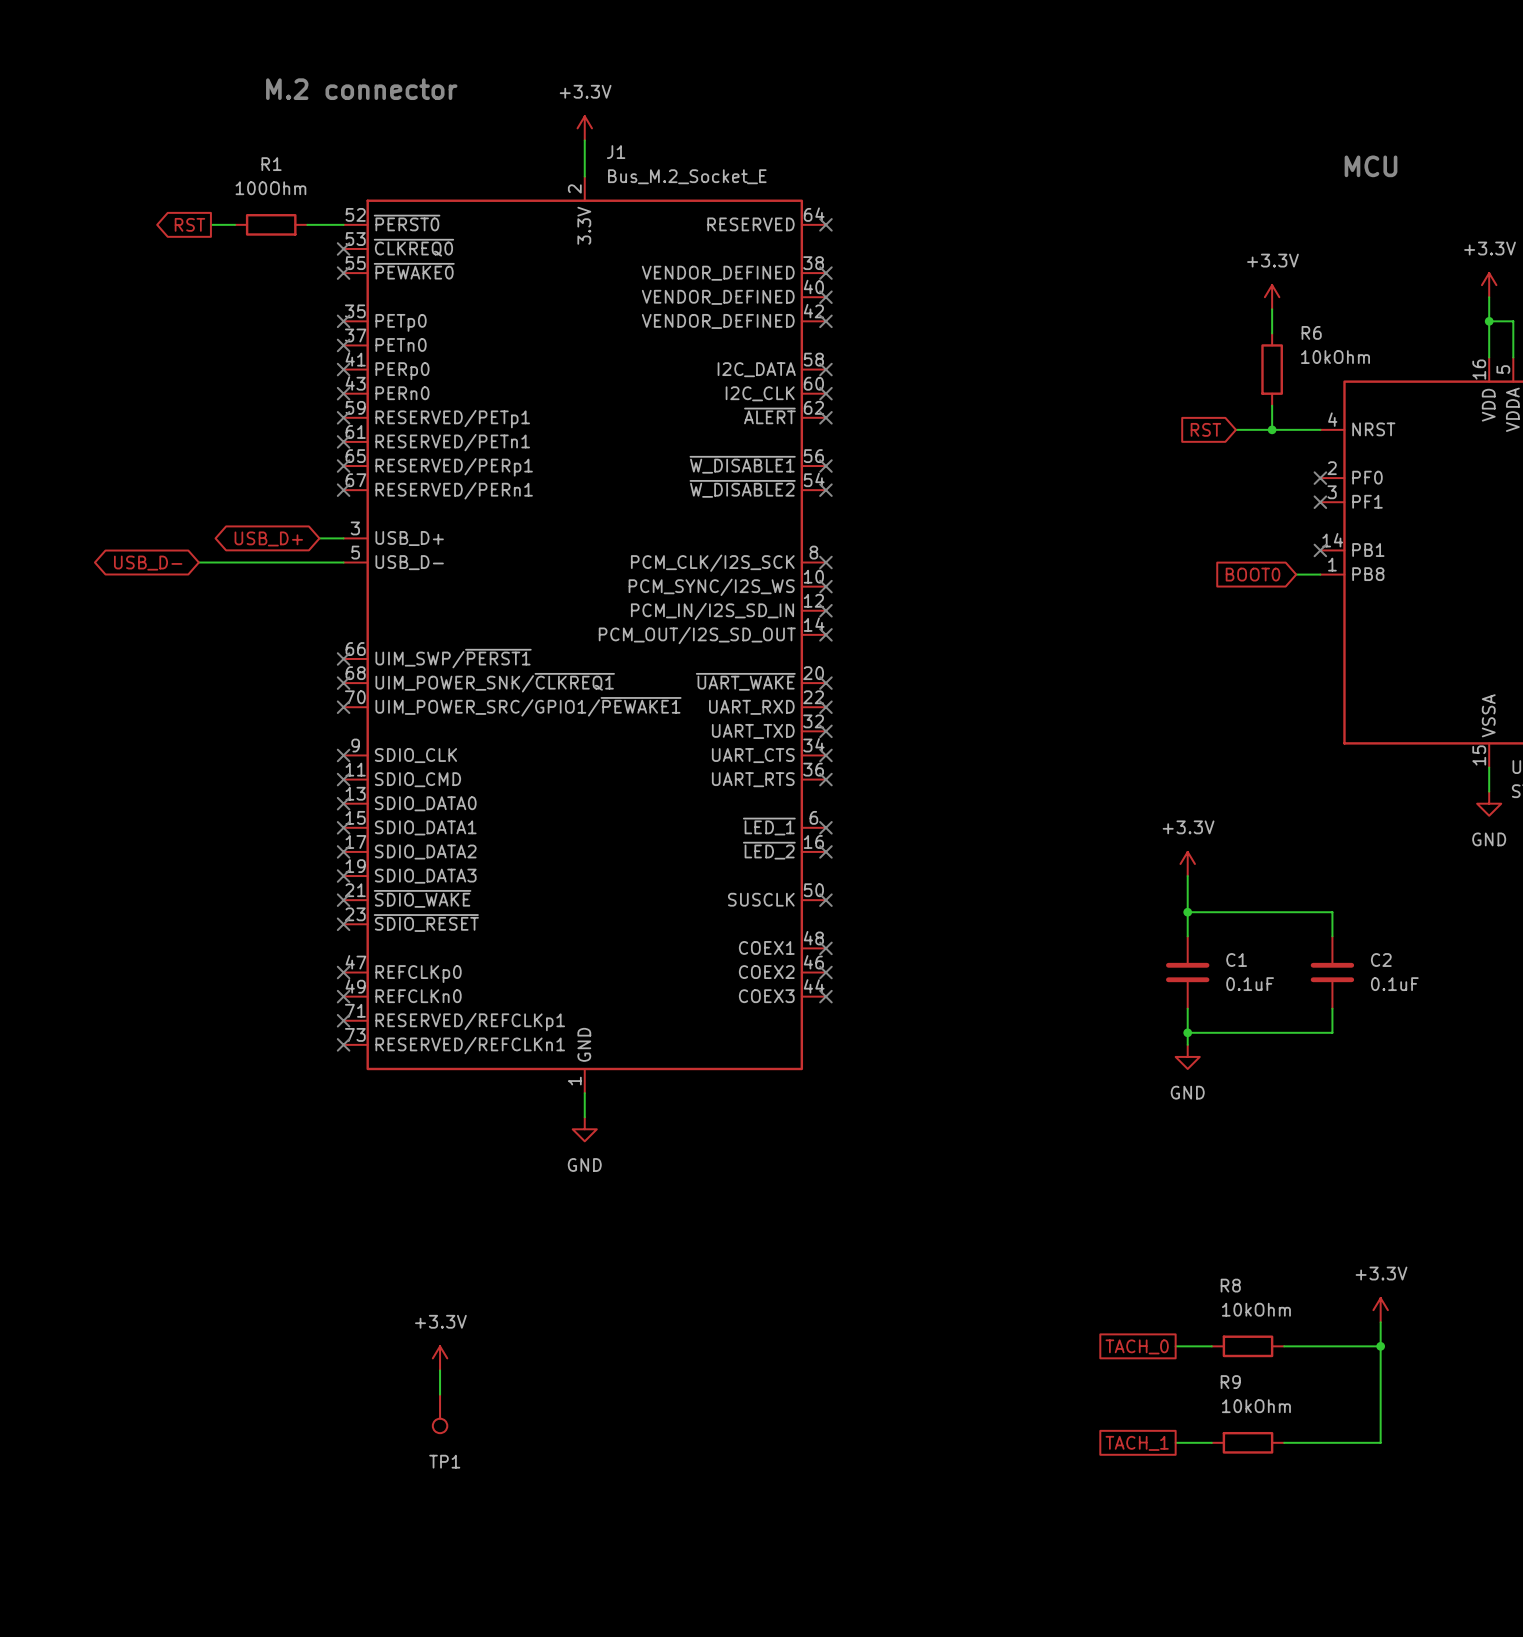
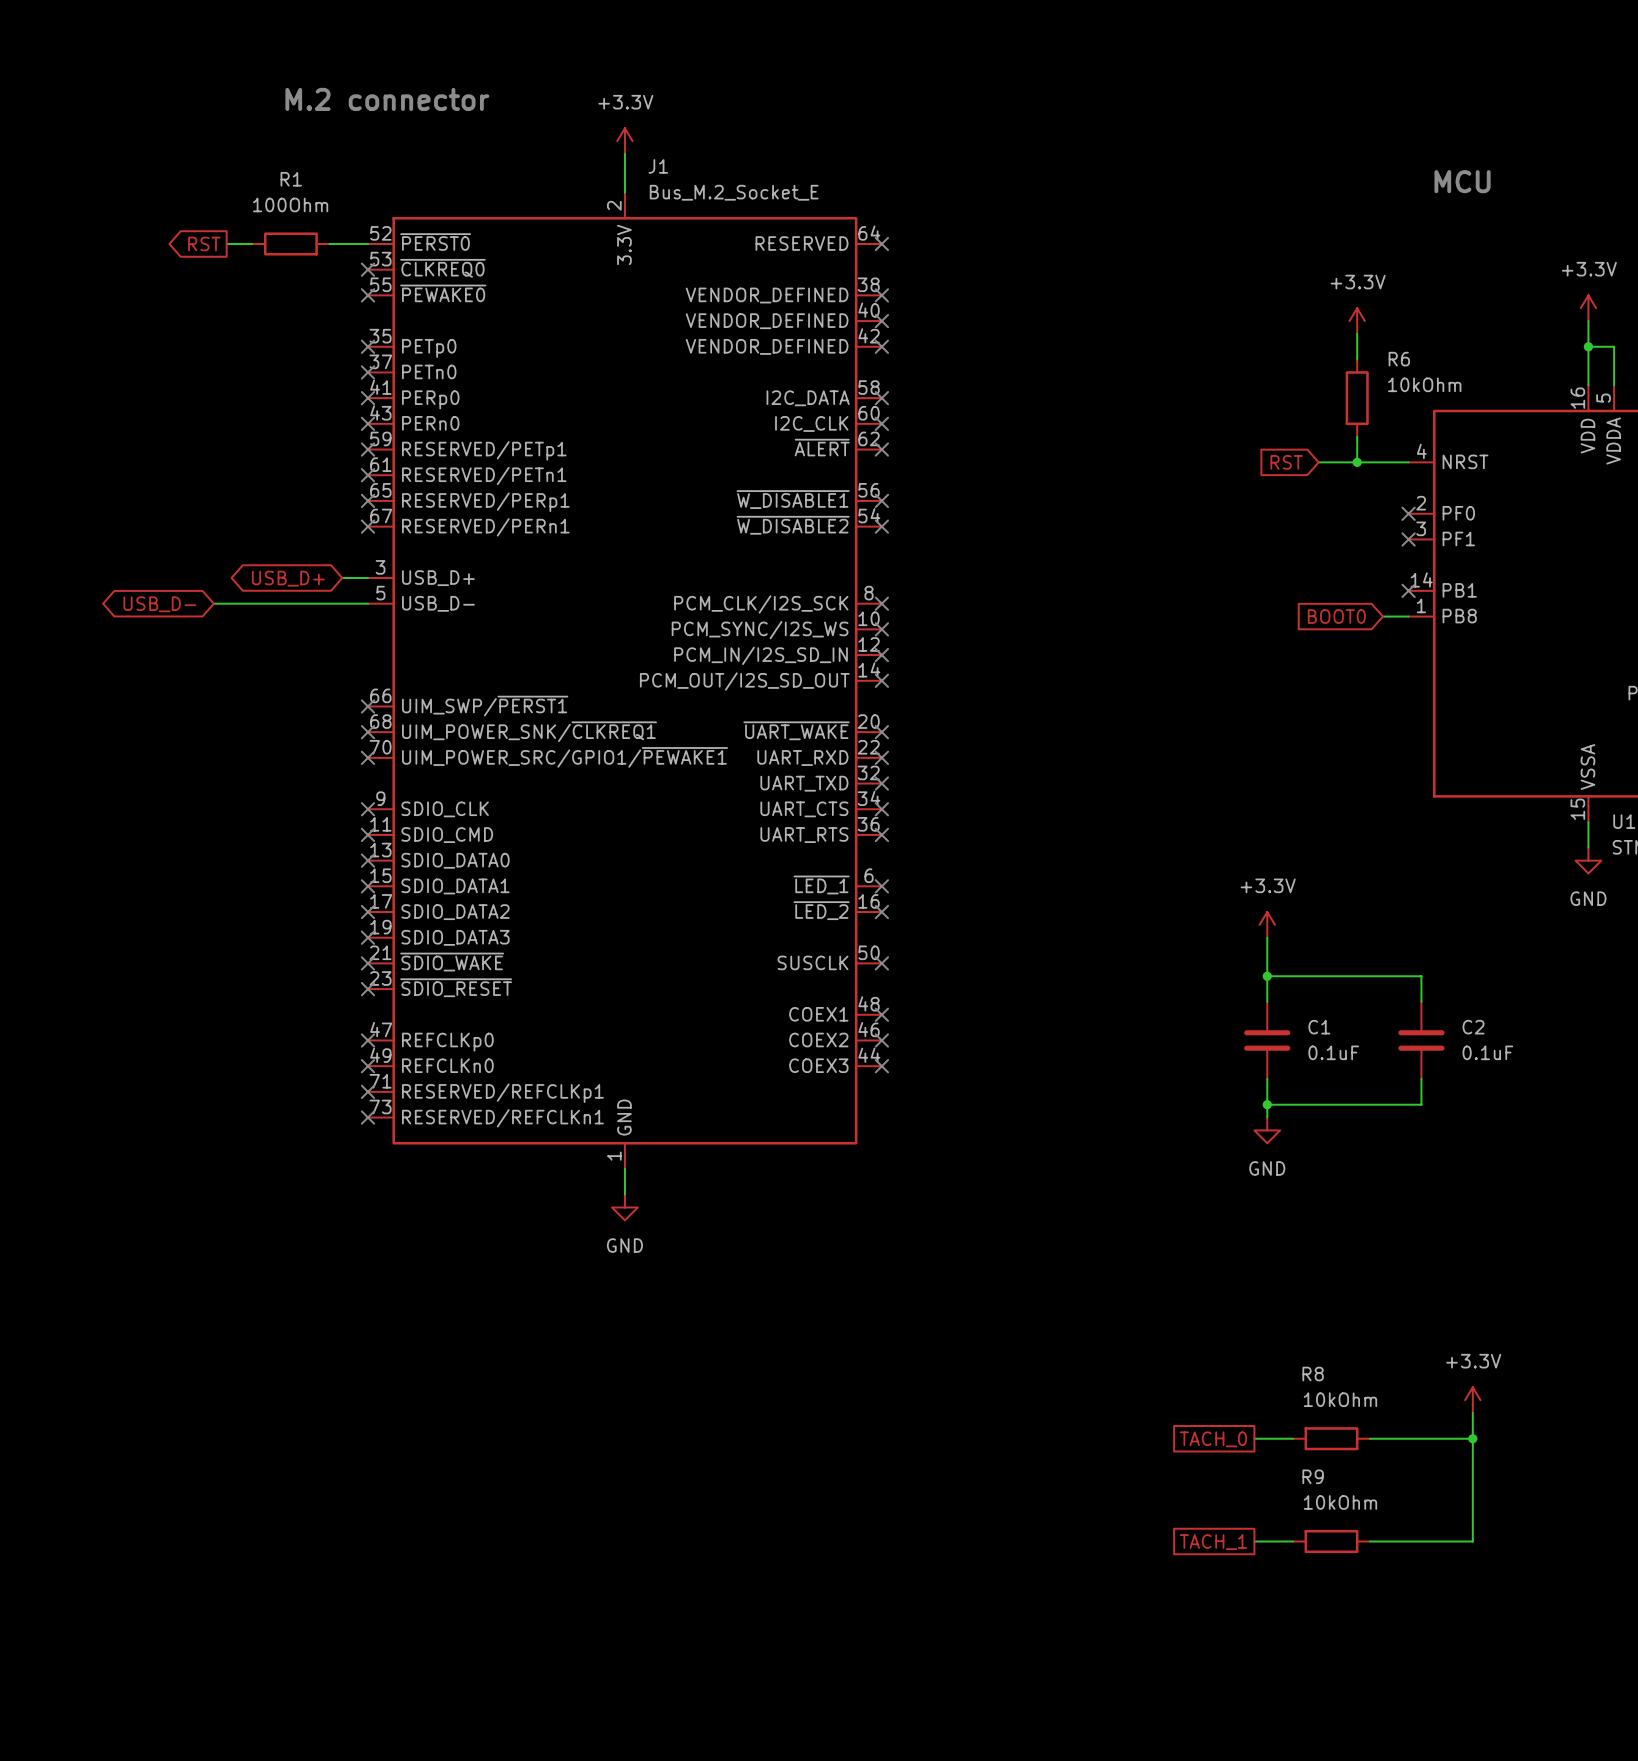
power symbol: +3.3V (440, 1358) -> none
wire: (440, 1370) (440, 1394) -> none
TP1: (440, 1413) -> none

